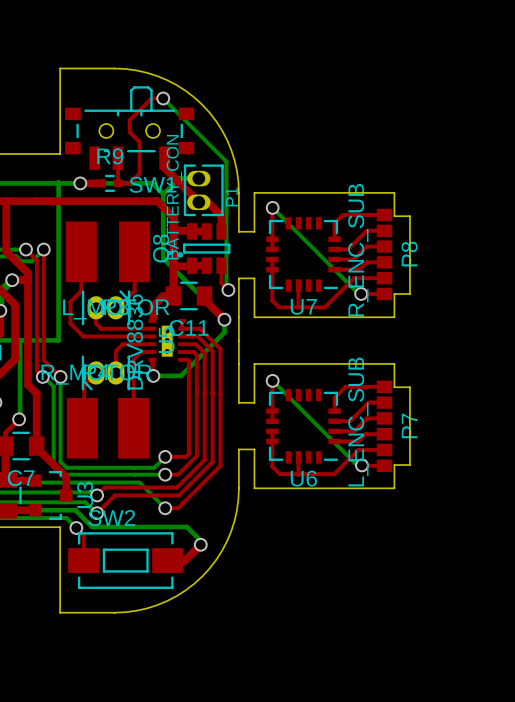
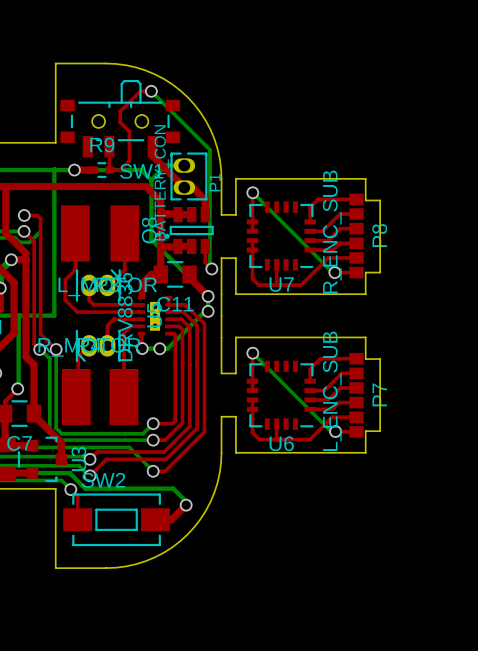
top track: none -> (24, 215) (37, 215) (40, 218) (40, 231)
via position: (43, 249) -> (24, 215)
via: none -> (208, 311)
via: none -> (159, 348)

